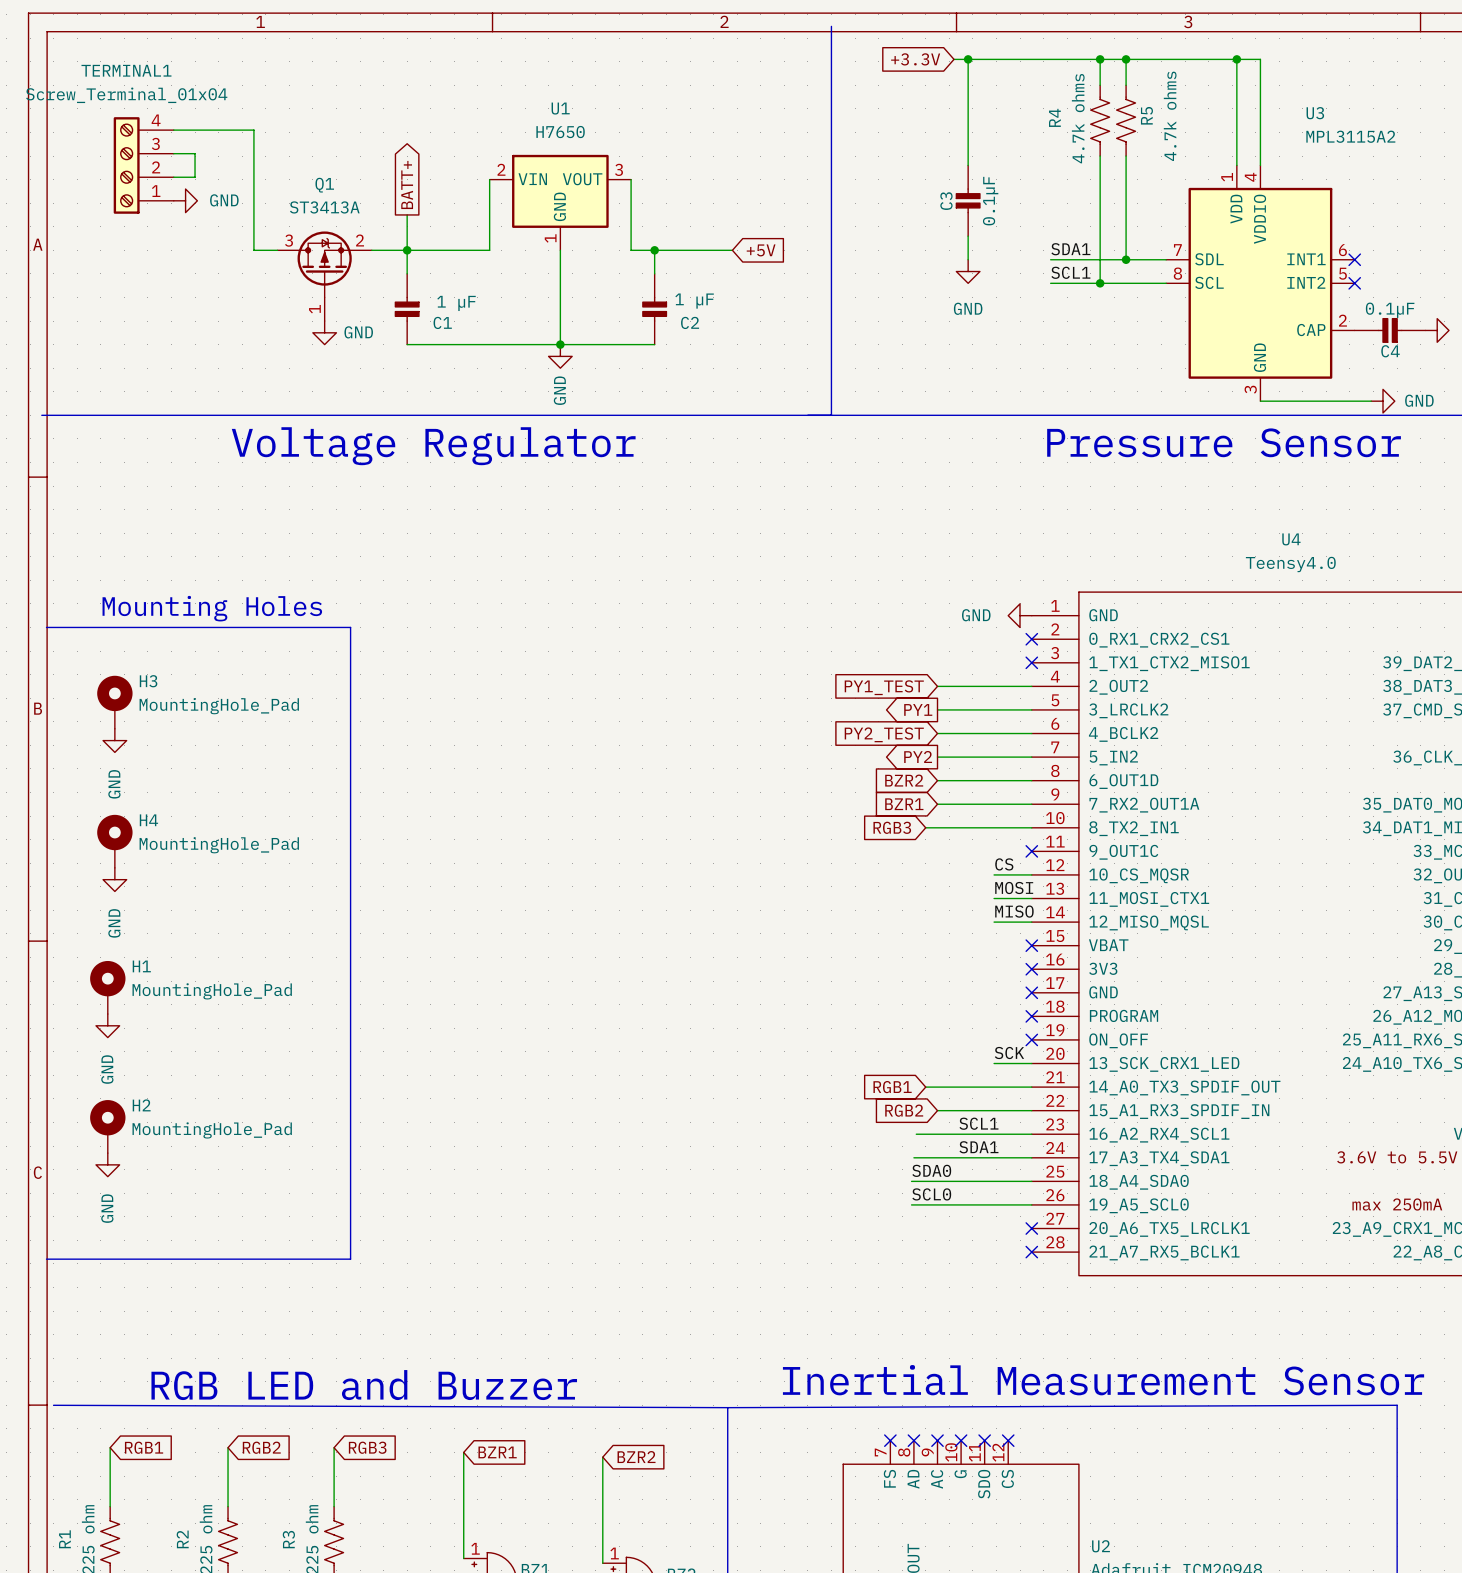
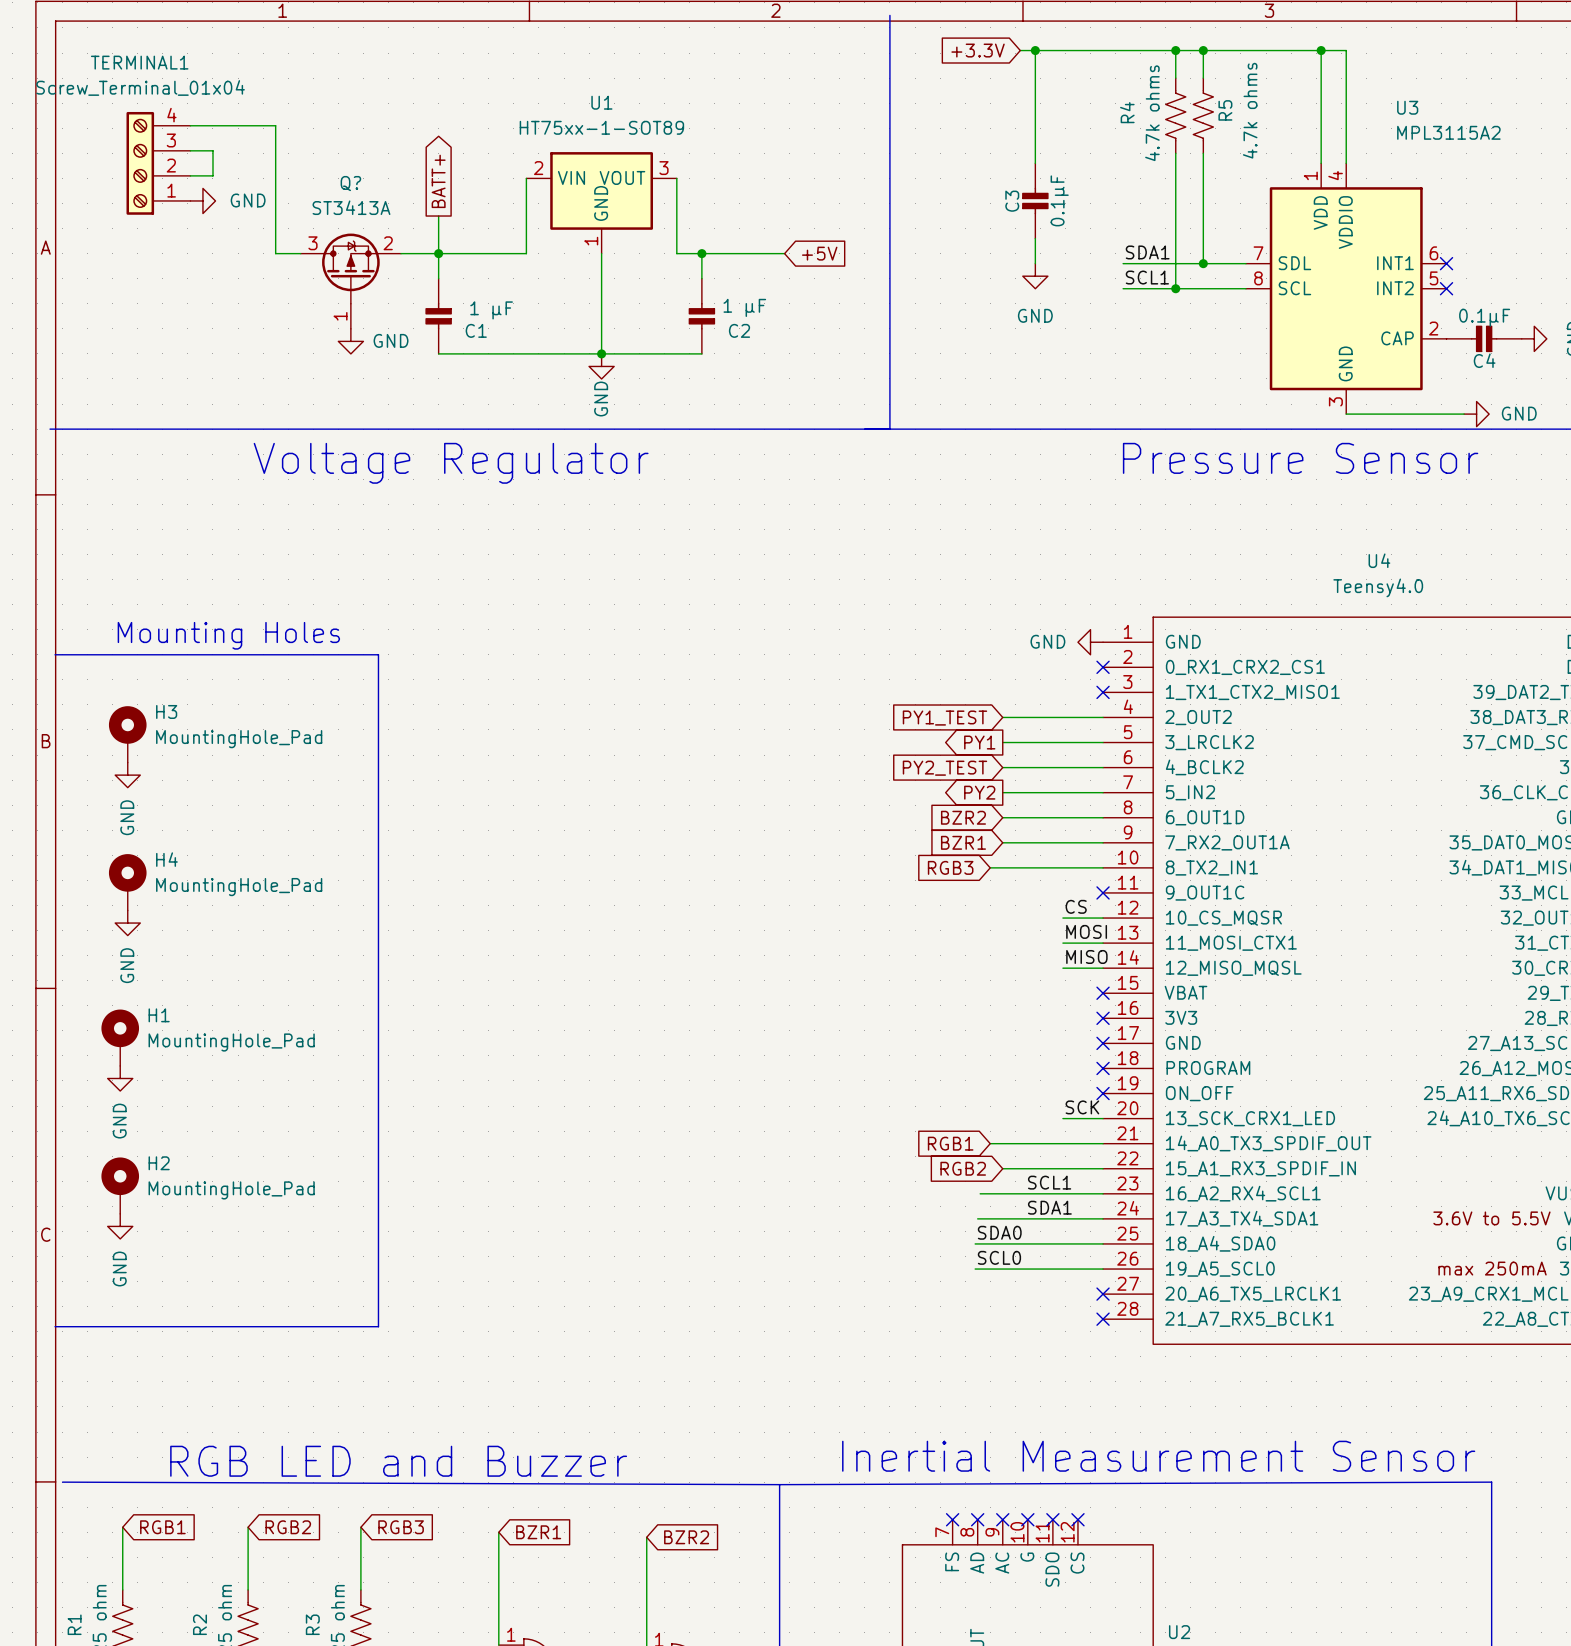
U1 value: H7650 (560, 132) -> HT75xx-1-SOT89 (601, 127)
Q1 name: Q1 (324, 185) -> Q? (350, 183)

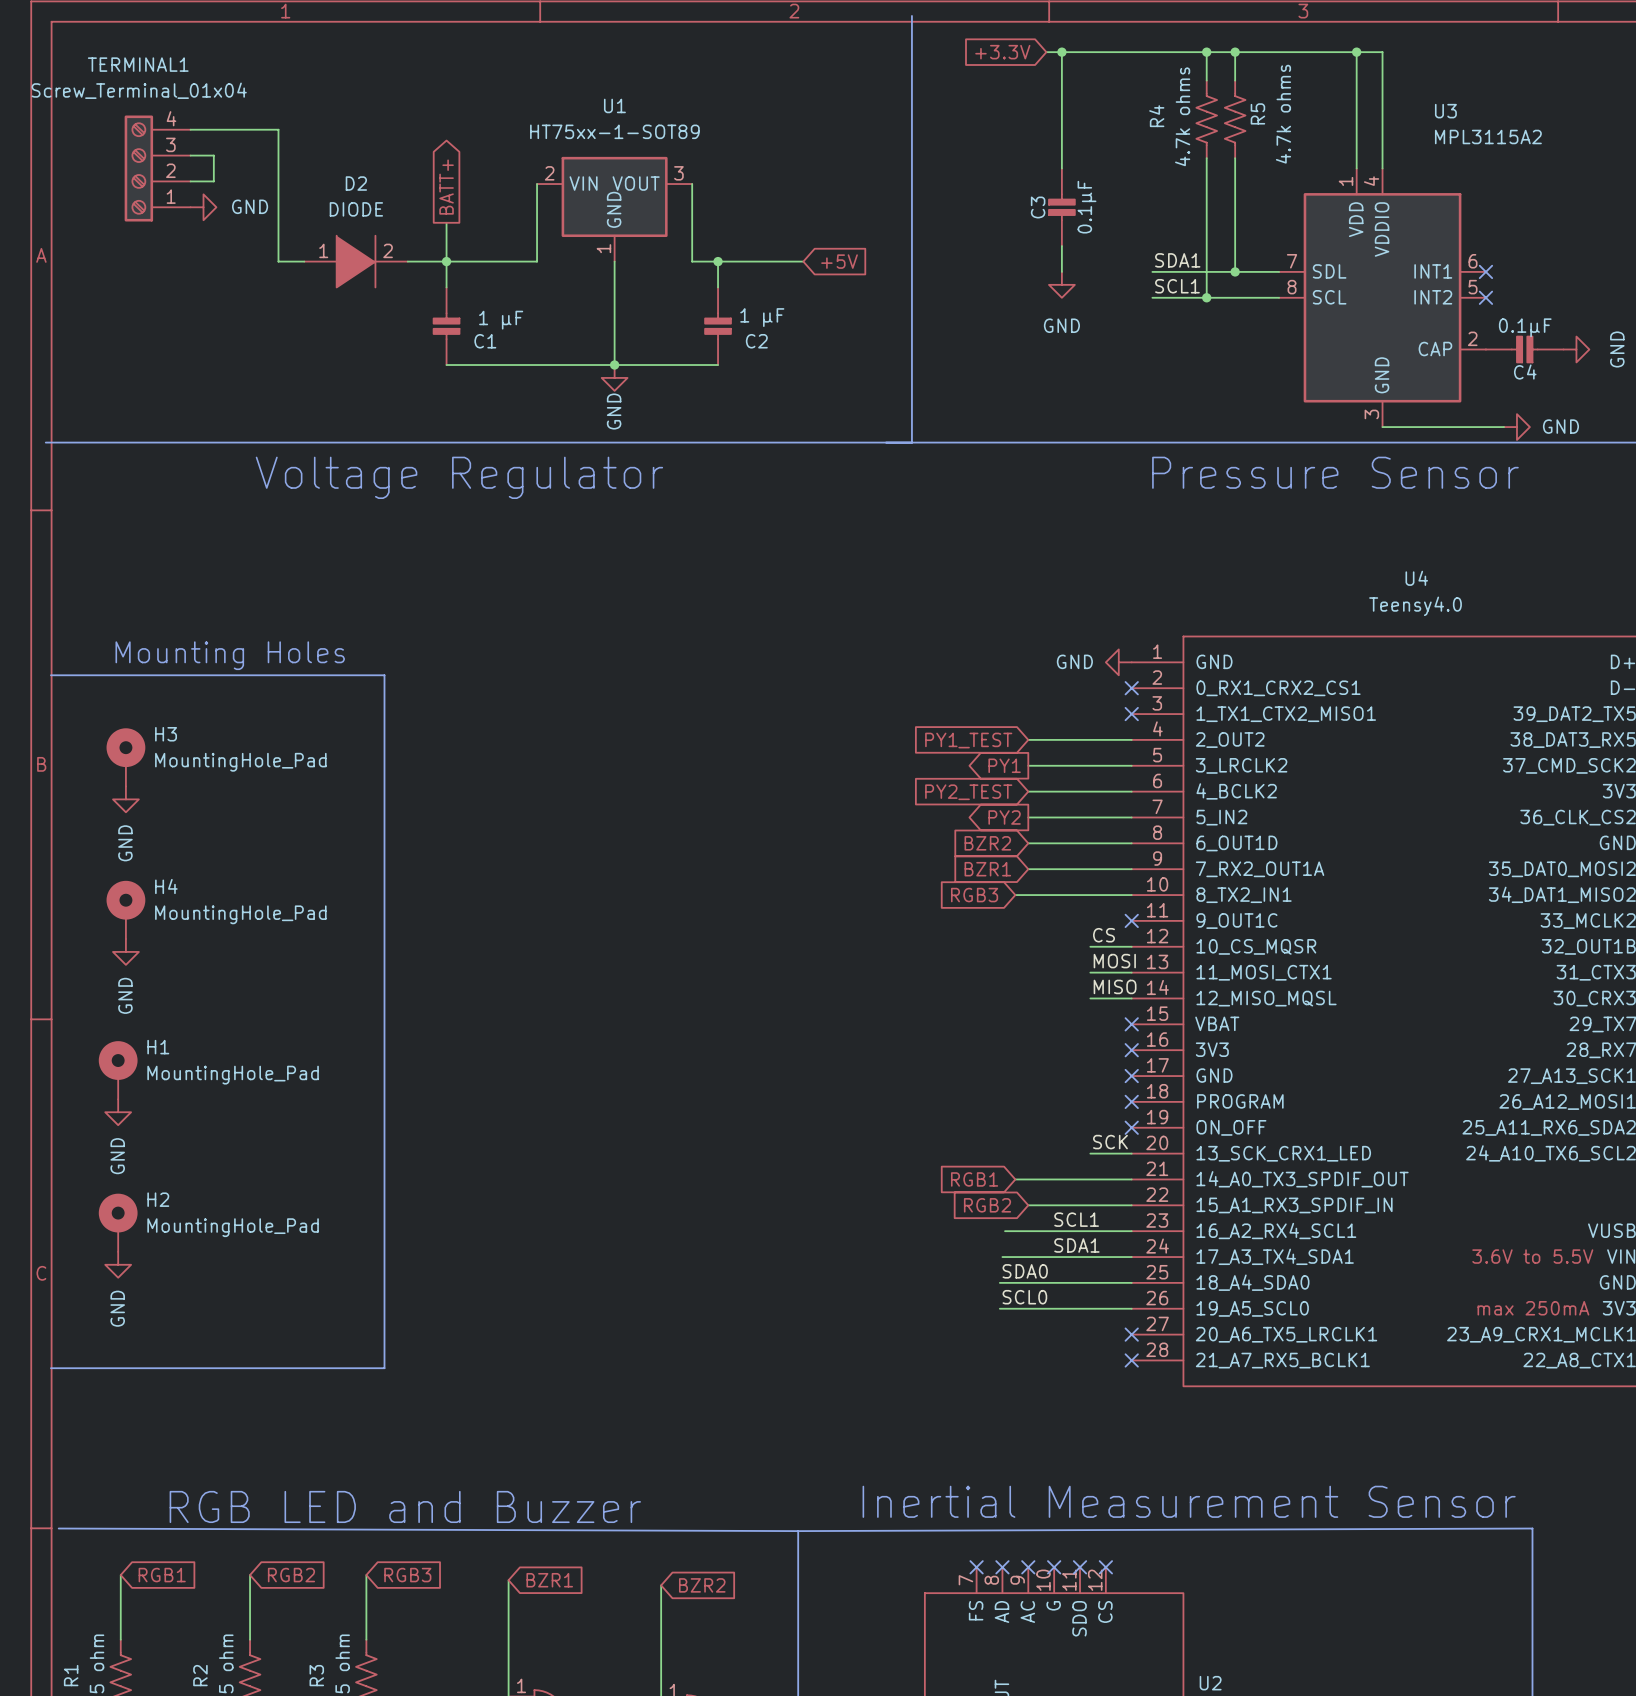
D2: none -> DIODE (356, 261)
Q?: ST3413A (350, 281) -> none
power symbol: GND (350, 341) -> none

